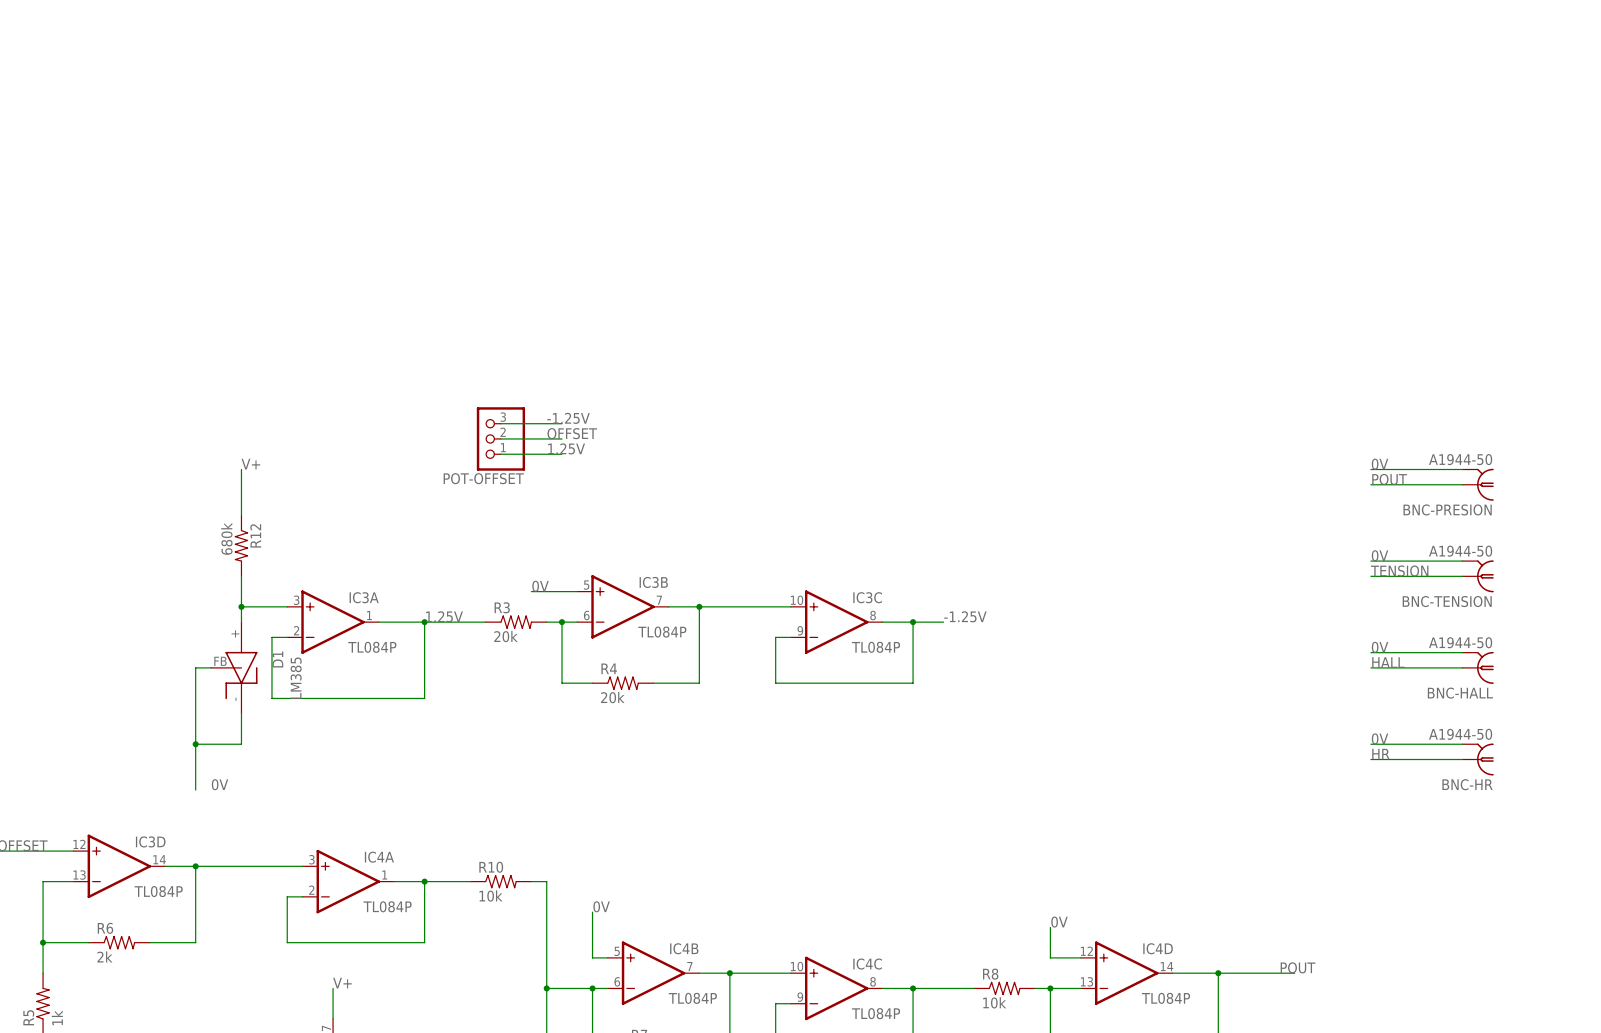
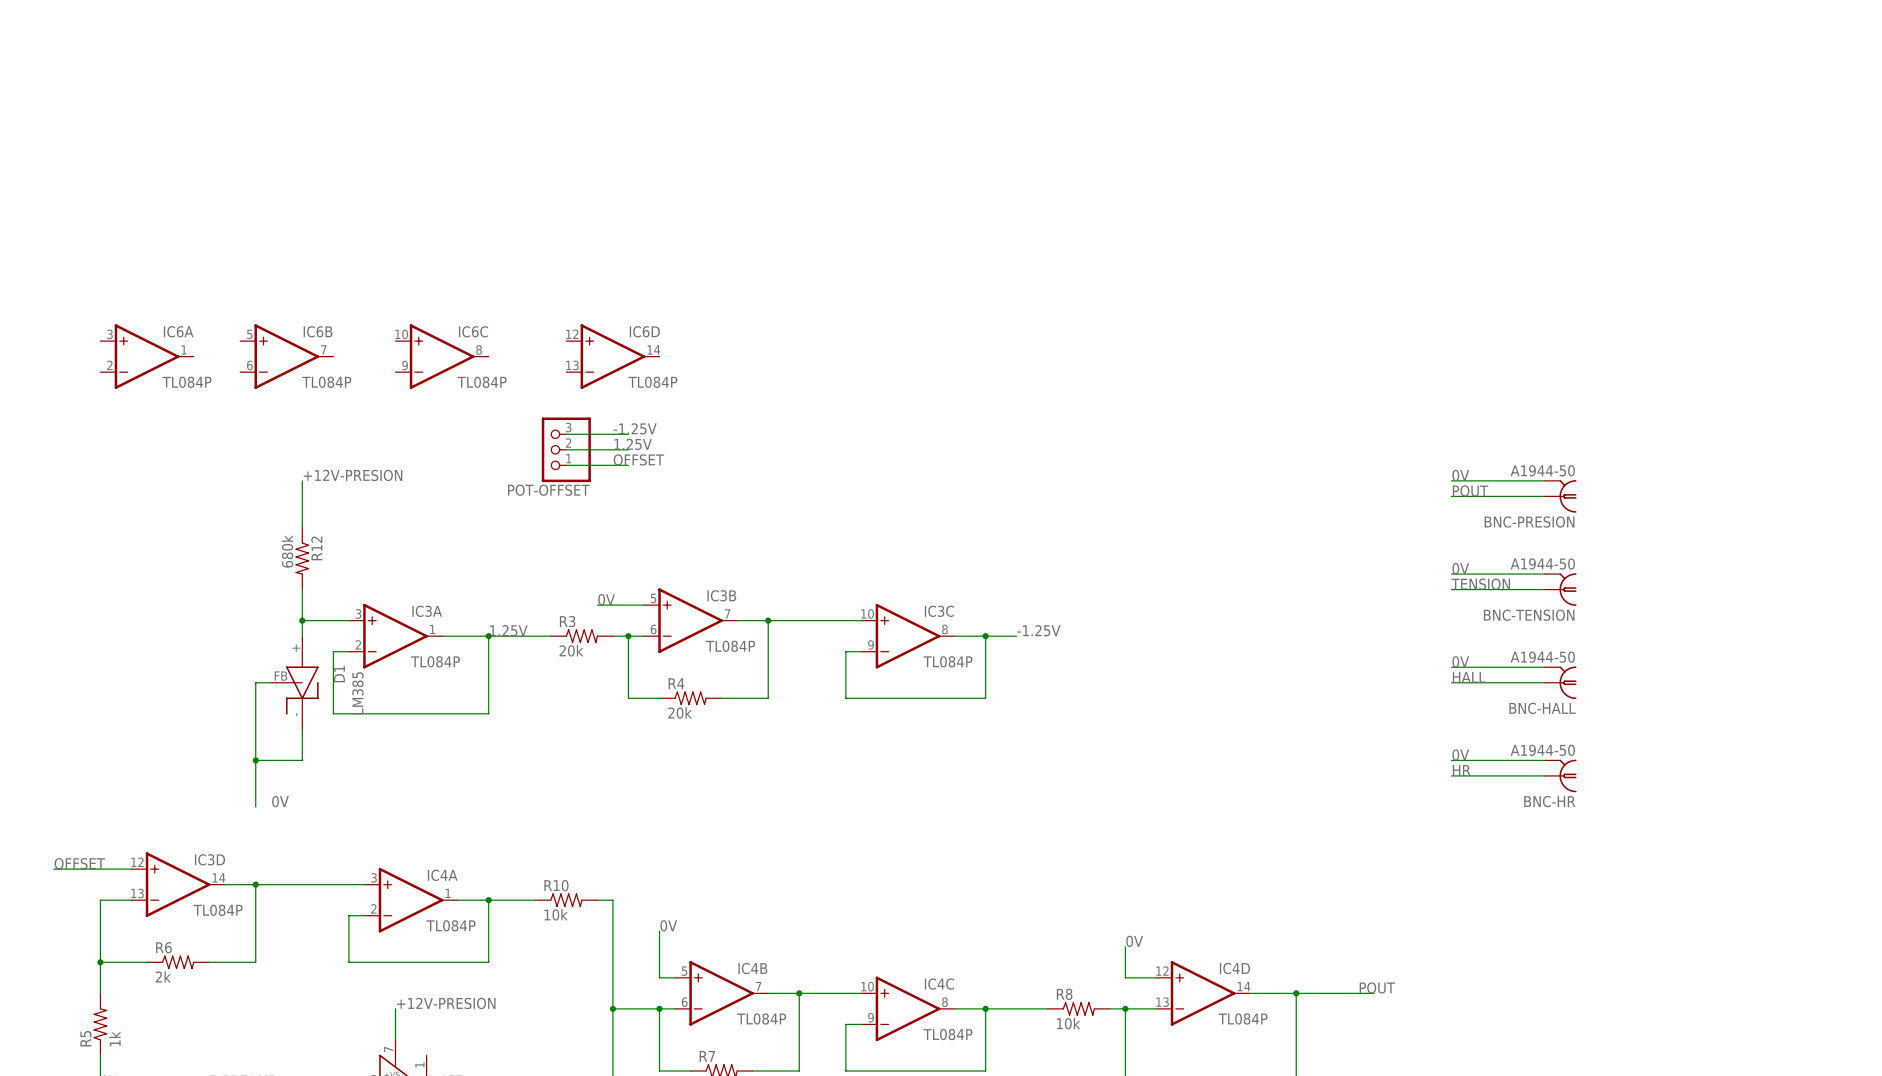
IC6A: none -> TL084P (147, 356)
IC6B: none -> TL084P (286, 356)
IC6C: none -> TL084P (442, 356)
IC6D: none -> TL084P (612, 356)
label: OFFSET (572, 433) -> 1.25V (633, 444)
label: 1.25V (566, 448) -> OFFSET (638, 459)
label: V+ (250, 464) -> +12V-PRESION (353, 475)
label: V+ (342, 983) -> +12V-PRESION (446, 1003)

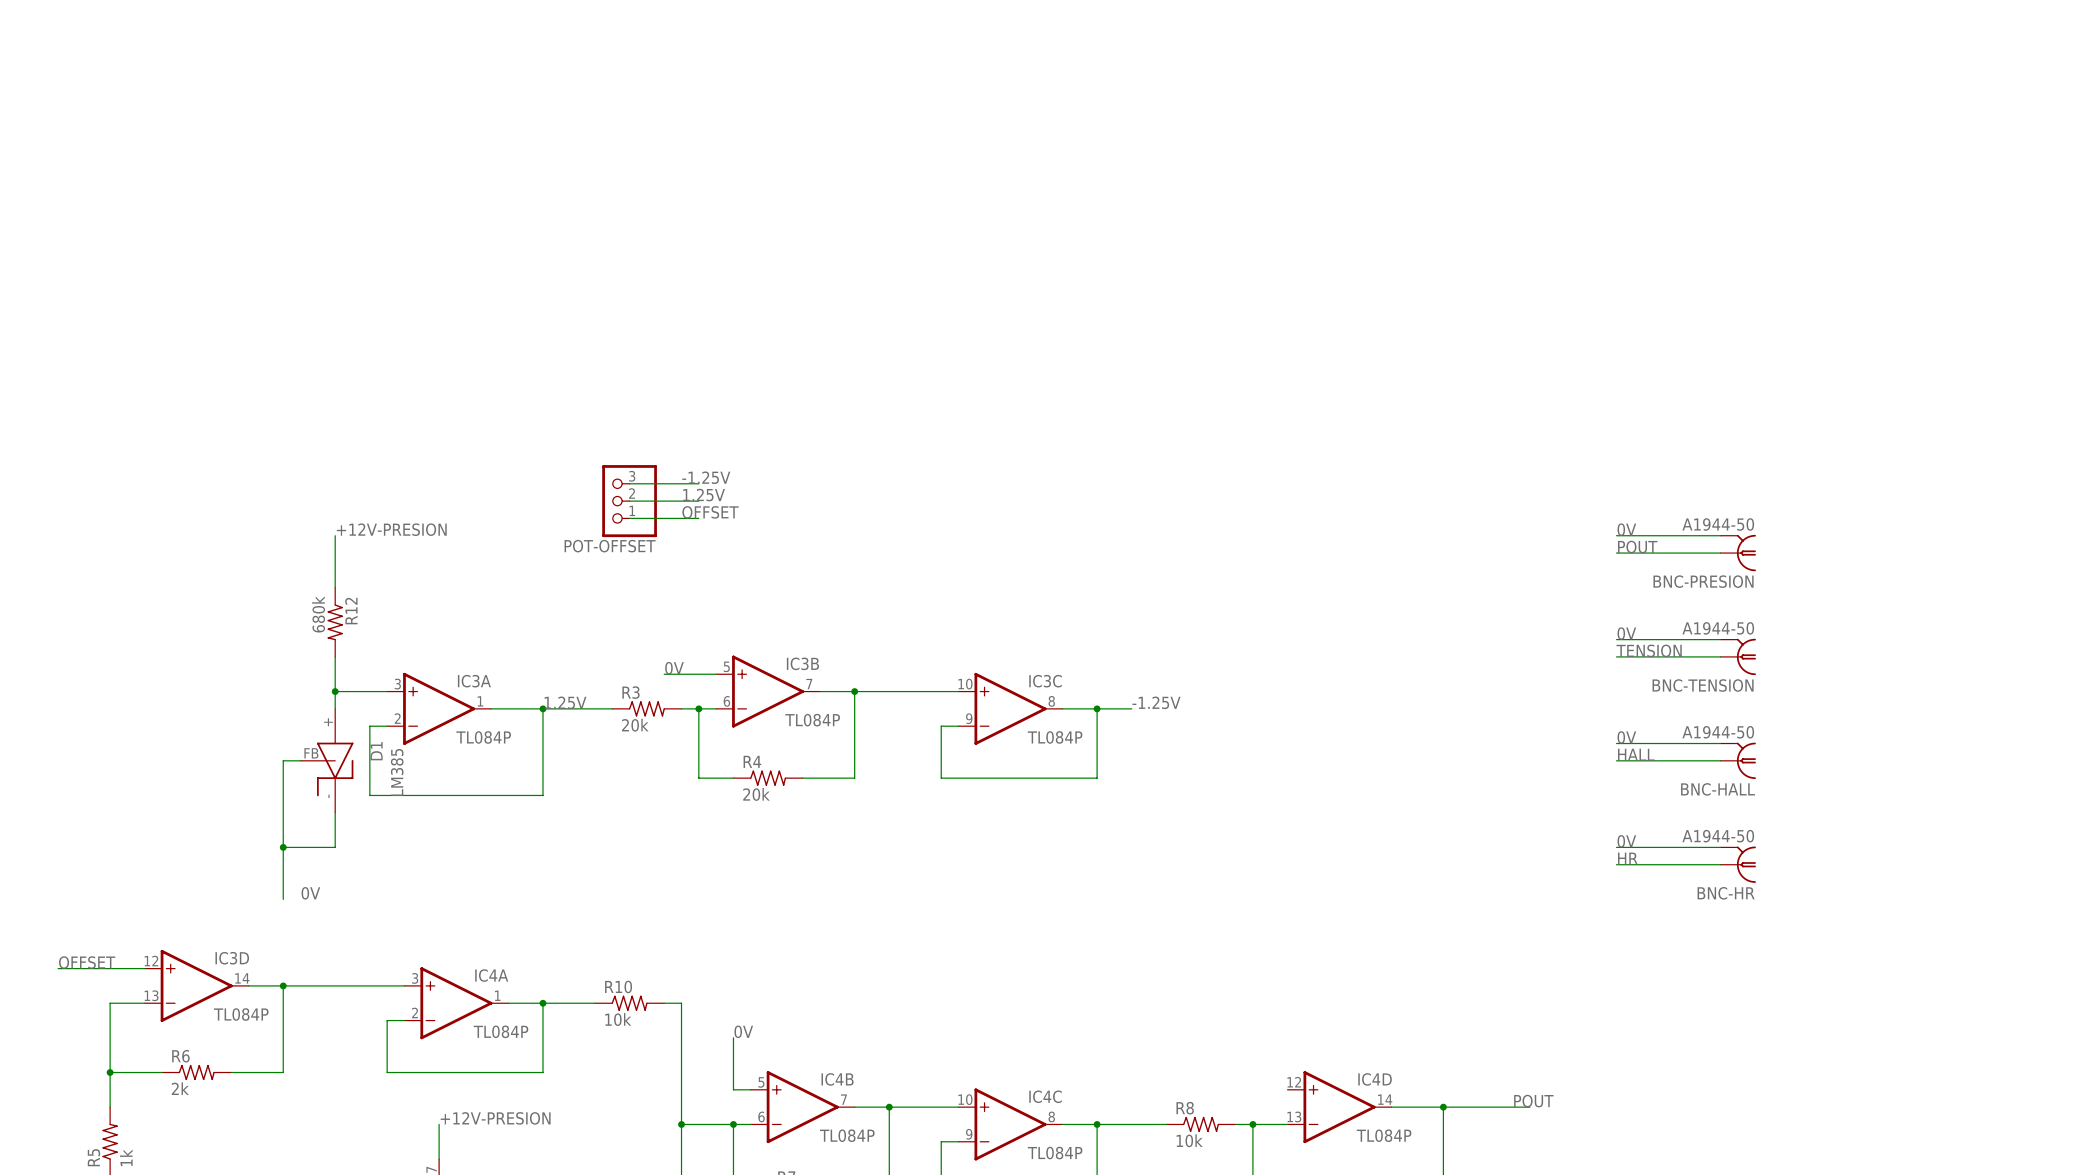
IC6A: TL084P (147, 356) -> none
IC6B: TL084P (286, 356) -> none
IC6C: TL084P (442, 356) -> none
IC6D: TL084P (612, 356) -> none
label: 0V (1134, 941) -> none
wire: (1125, 946) (1125, 977) (1156, 977) -> none

